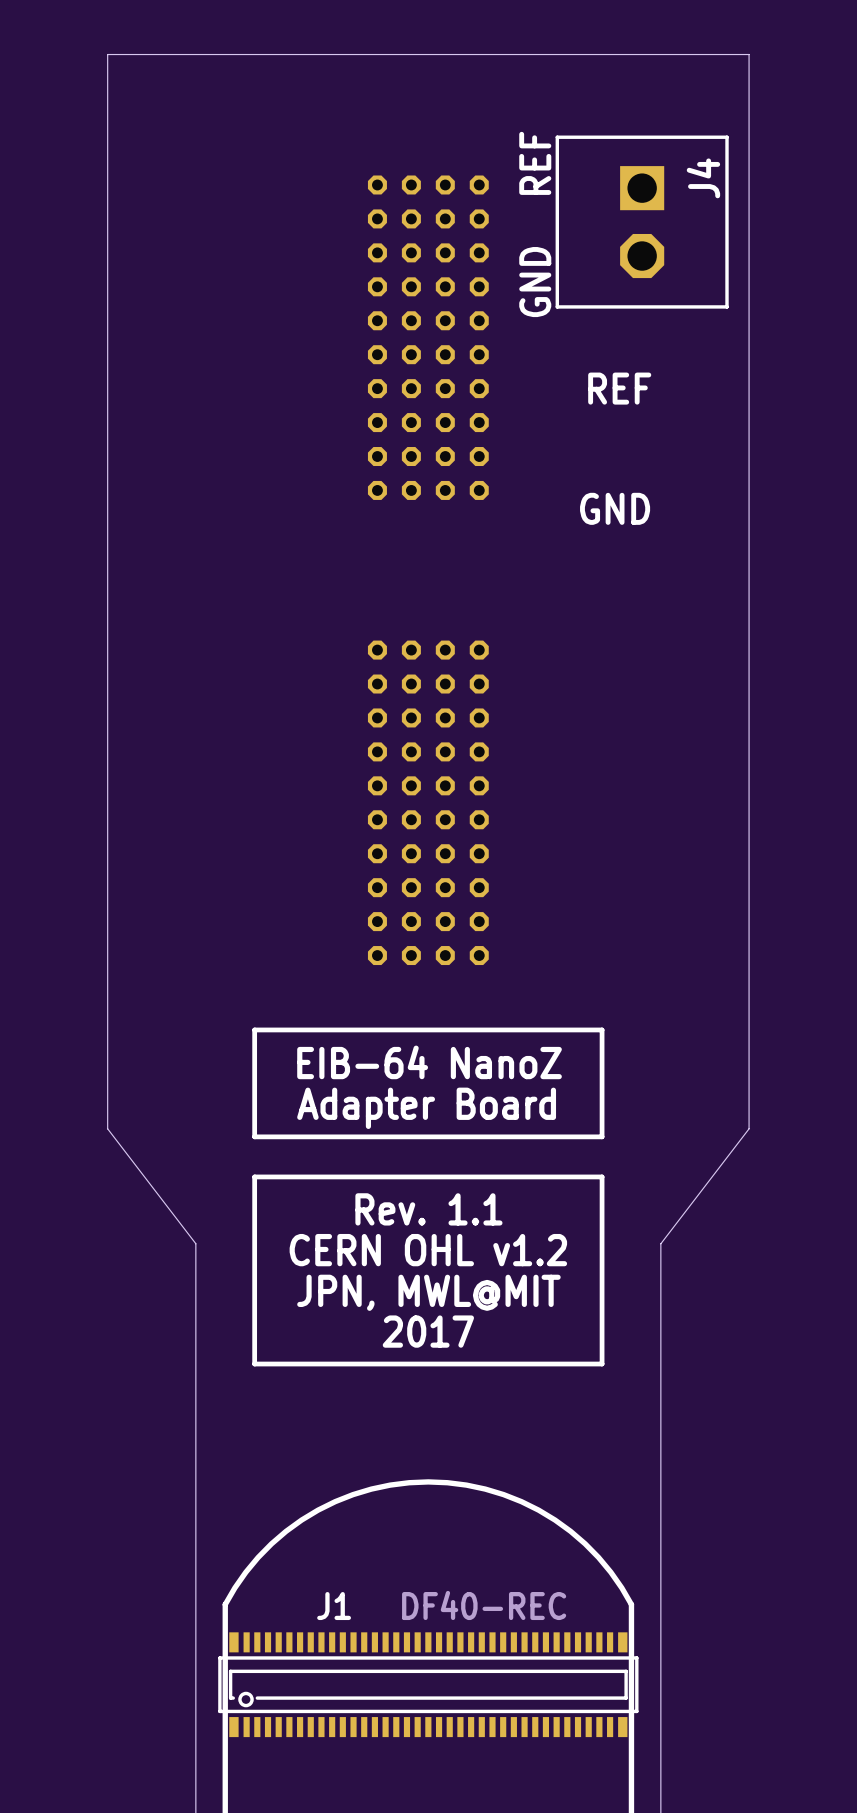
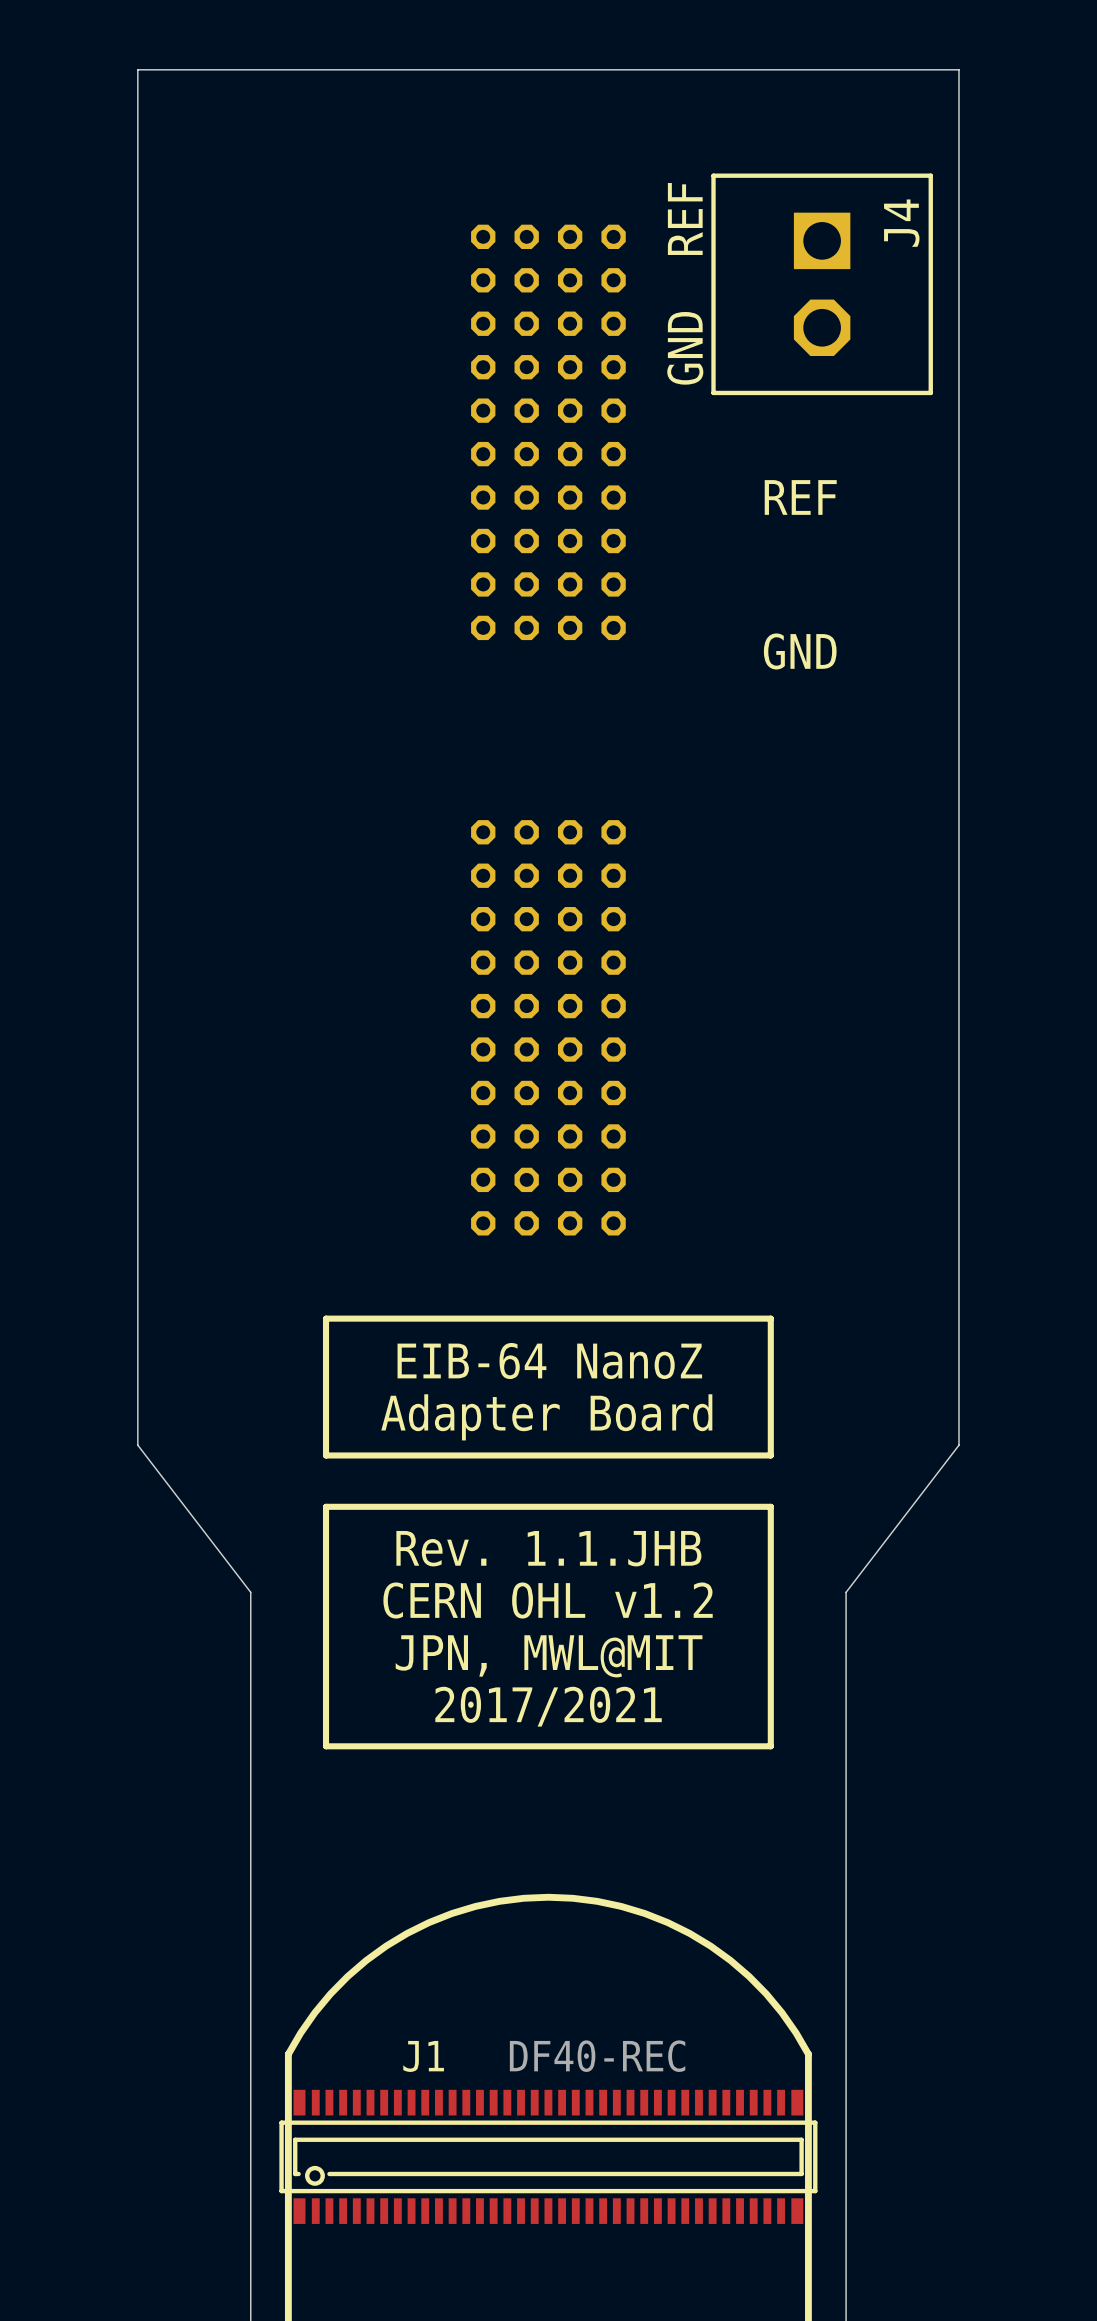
text: Rev. 1.1 (428, 1209) -> Rev. 1.1.JHB (548, 1548)
text: 2017 (428, 1331) -> 2017/2021 (548, 1706)

